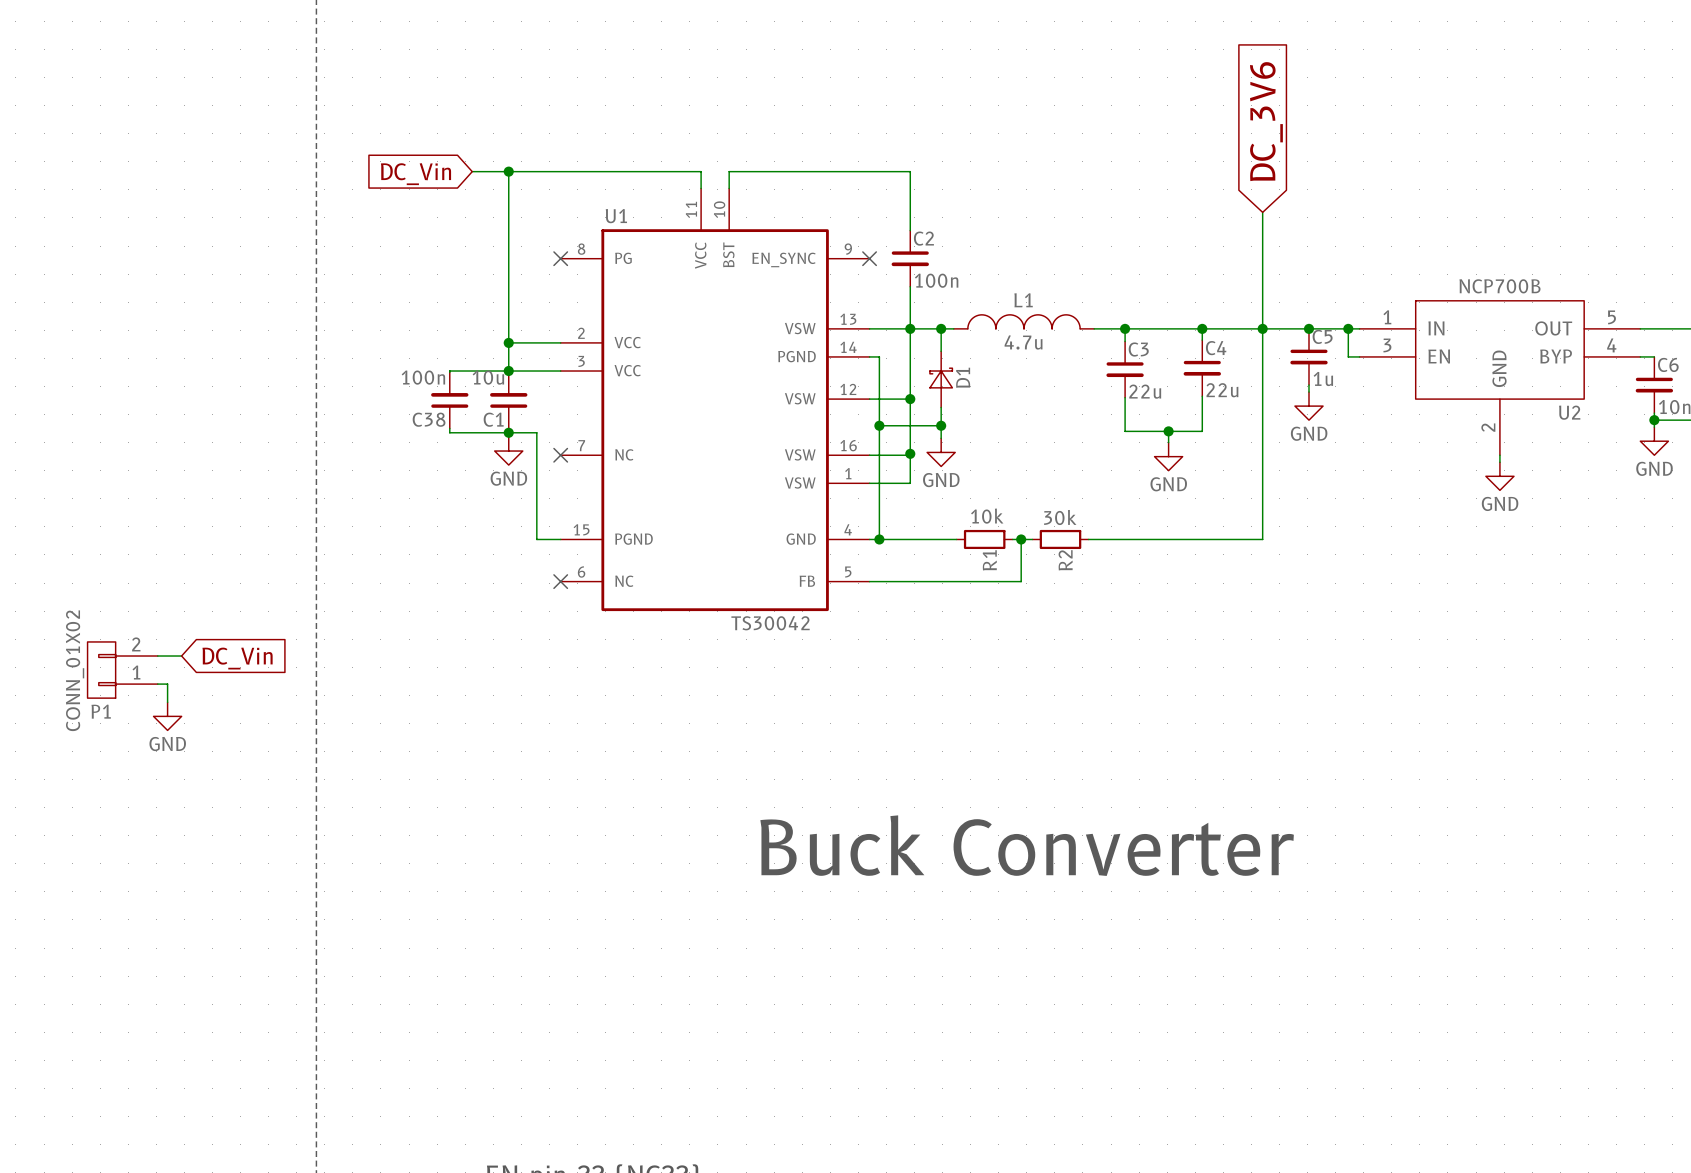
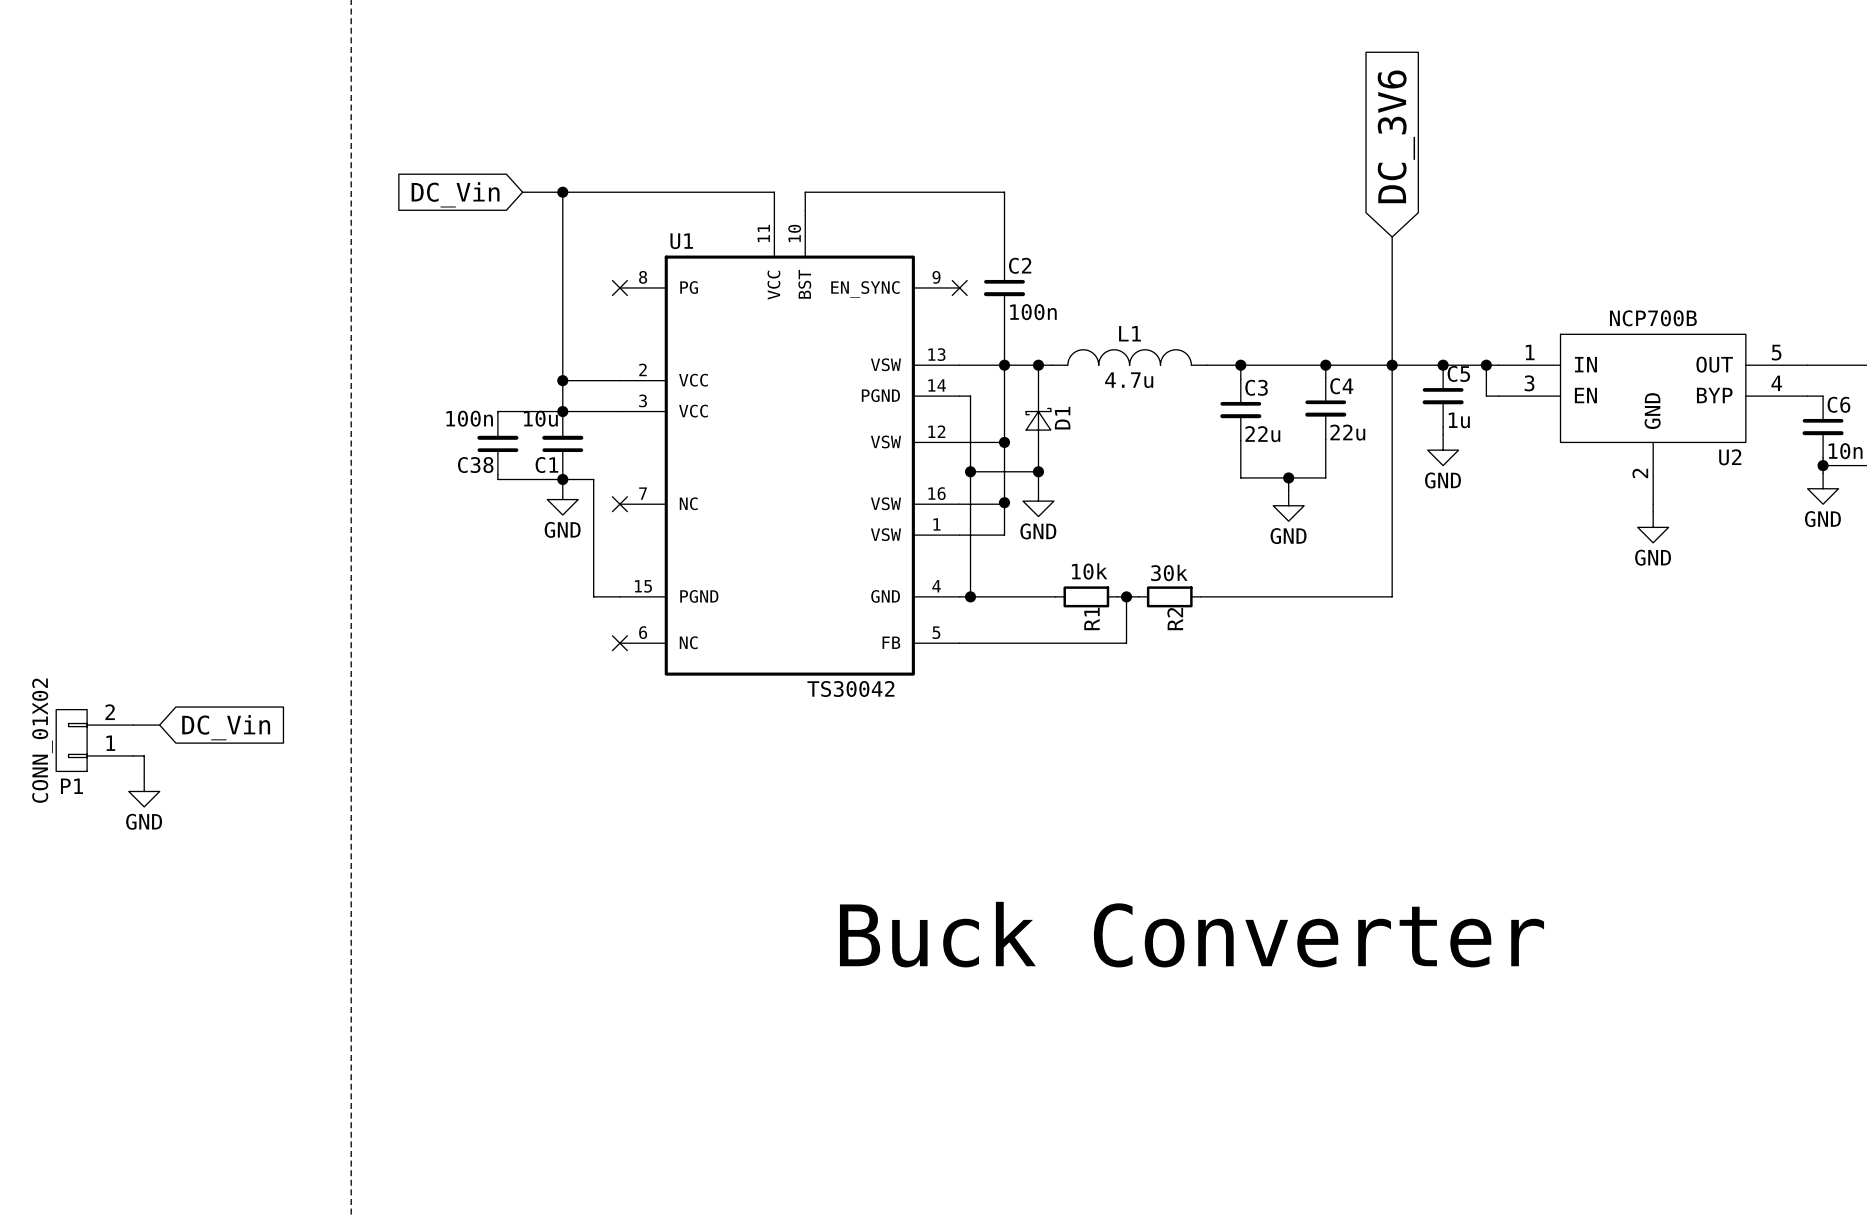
global label position: DC_Vin (237, 658) -> DC_Vin (226, 727)
P1 position: (122, 670) -> (94, 740)
wire: (157, 684) (167, 684) (167, 702) -> (133, 755) (144, 755) (144, 776)
power symbol position: GND (167, 716) -> GND (144, 791)

